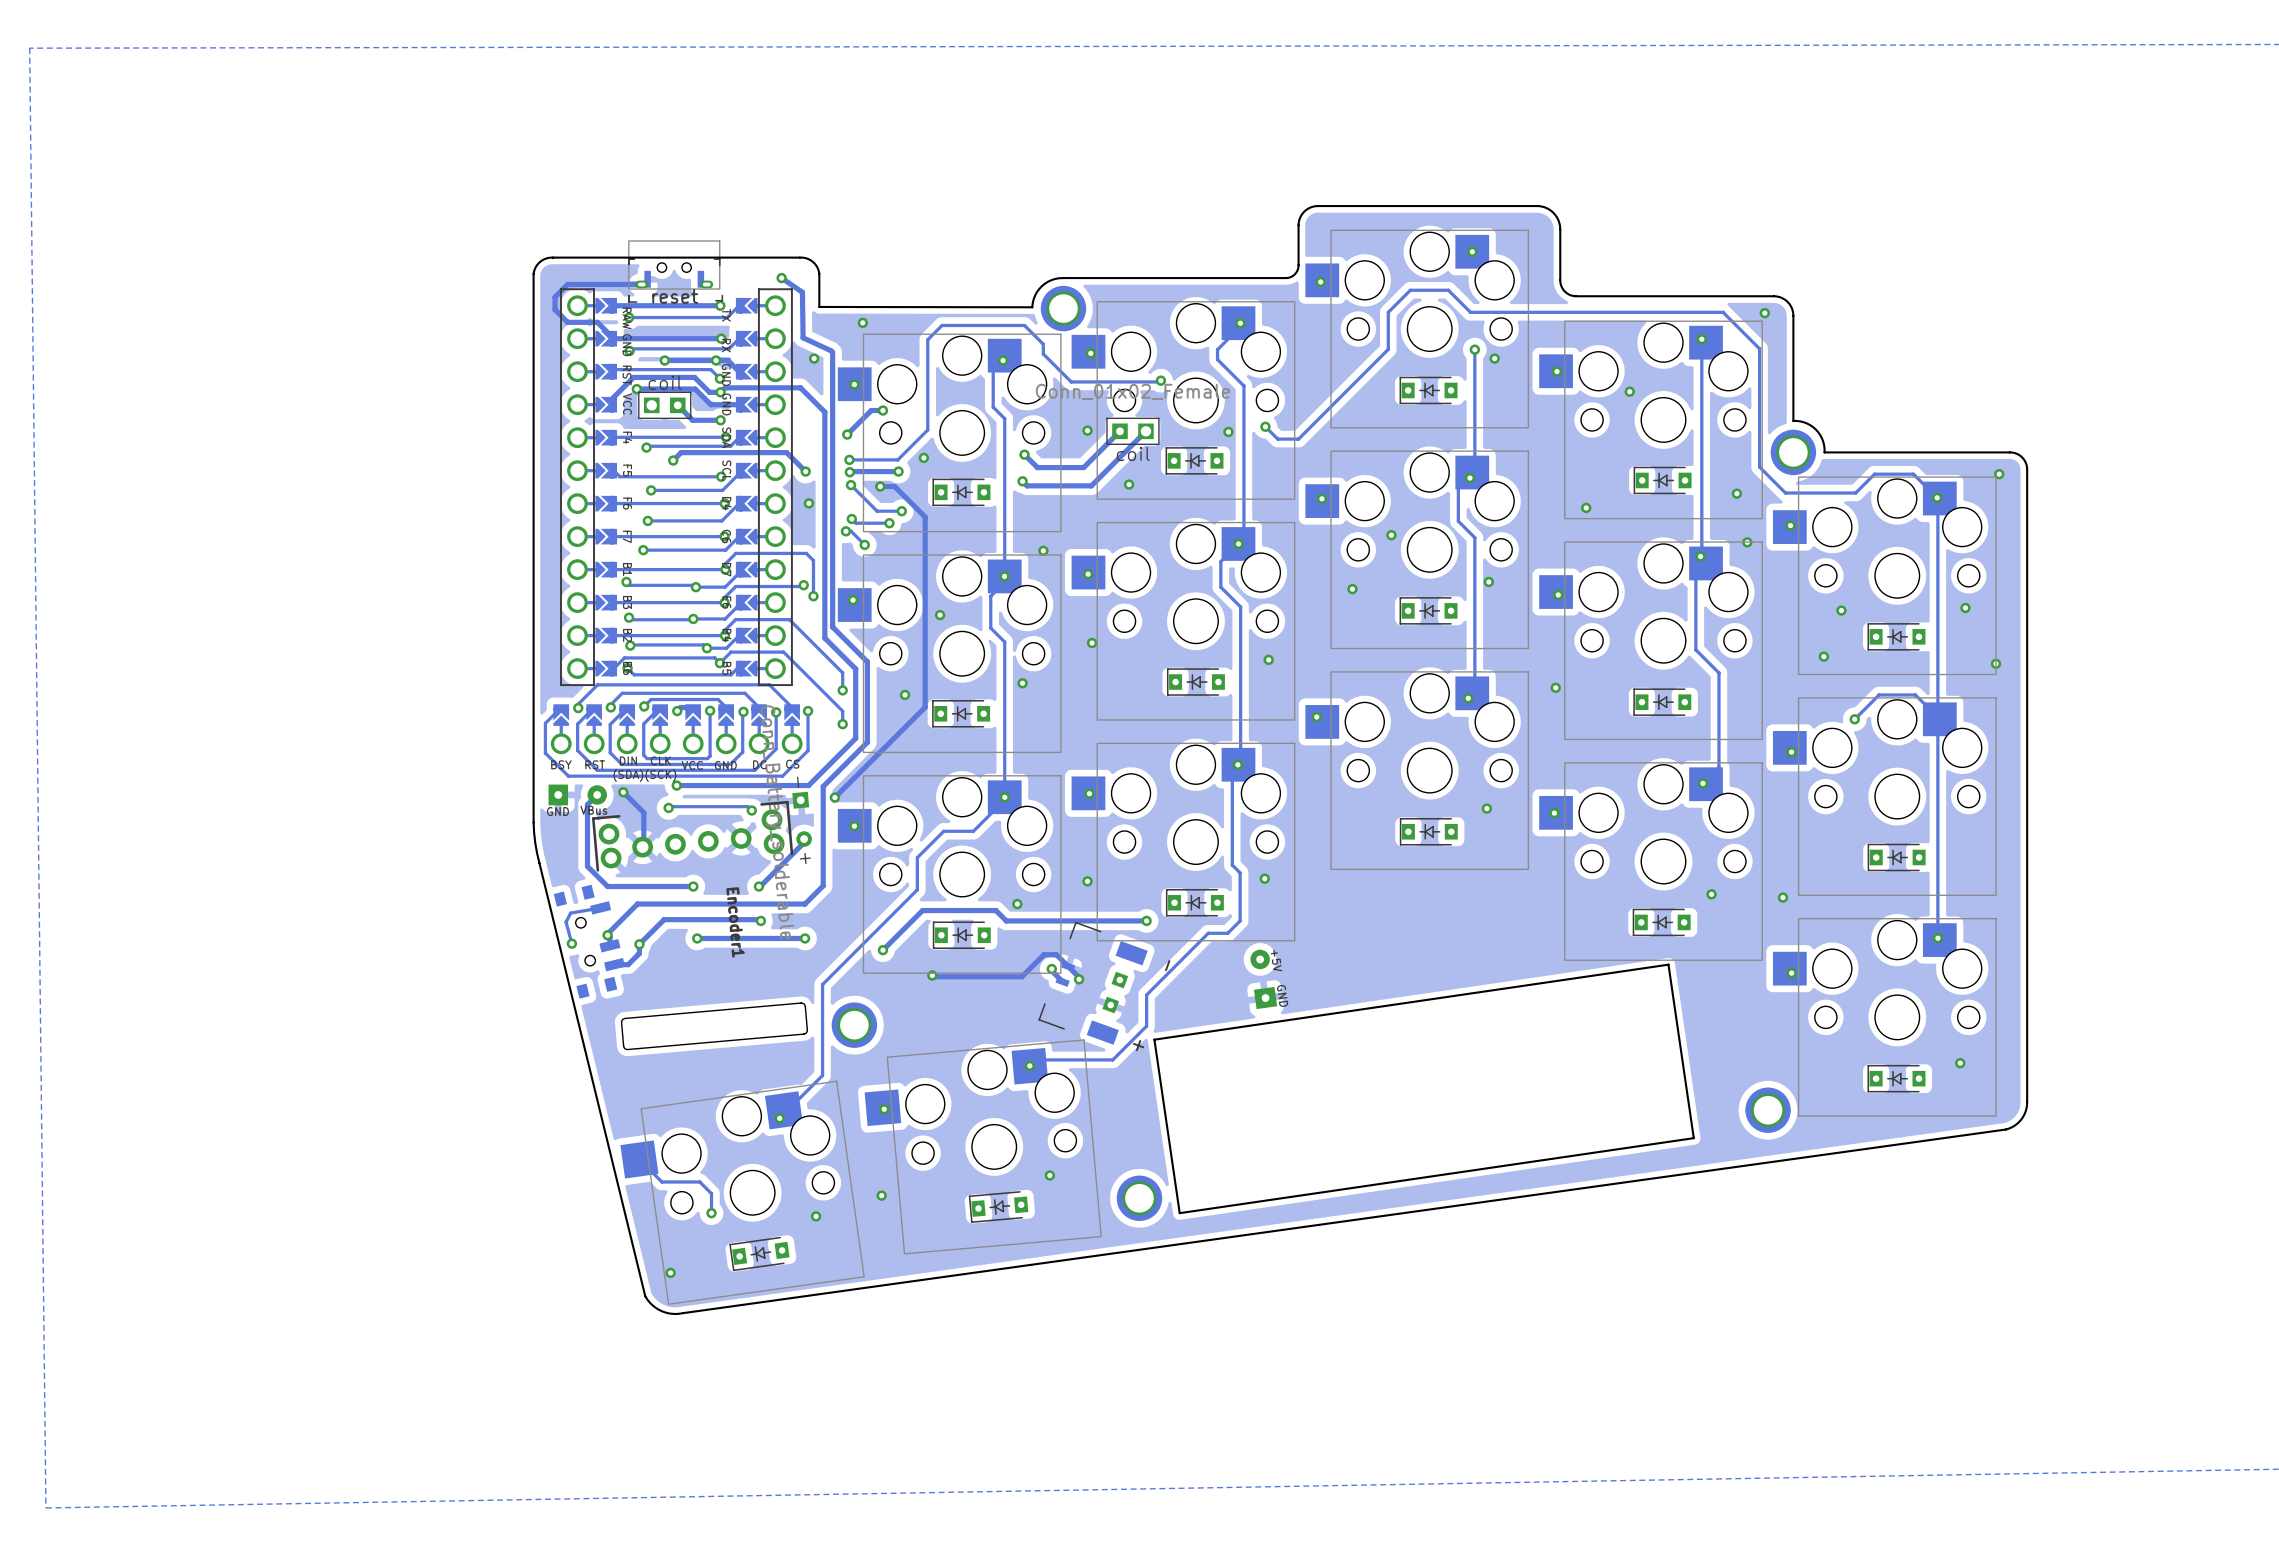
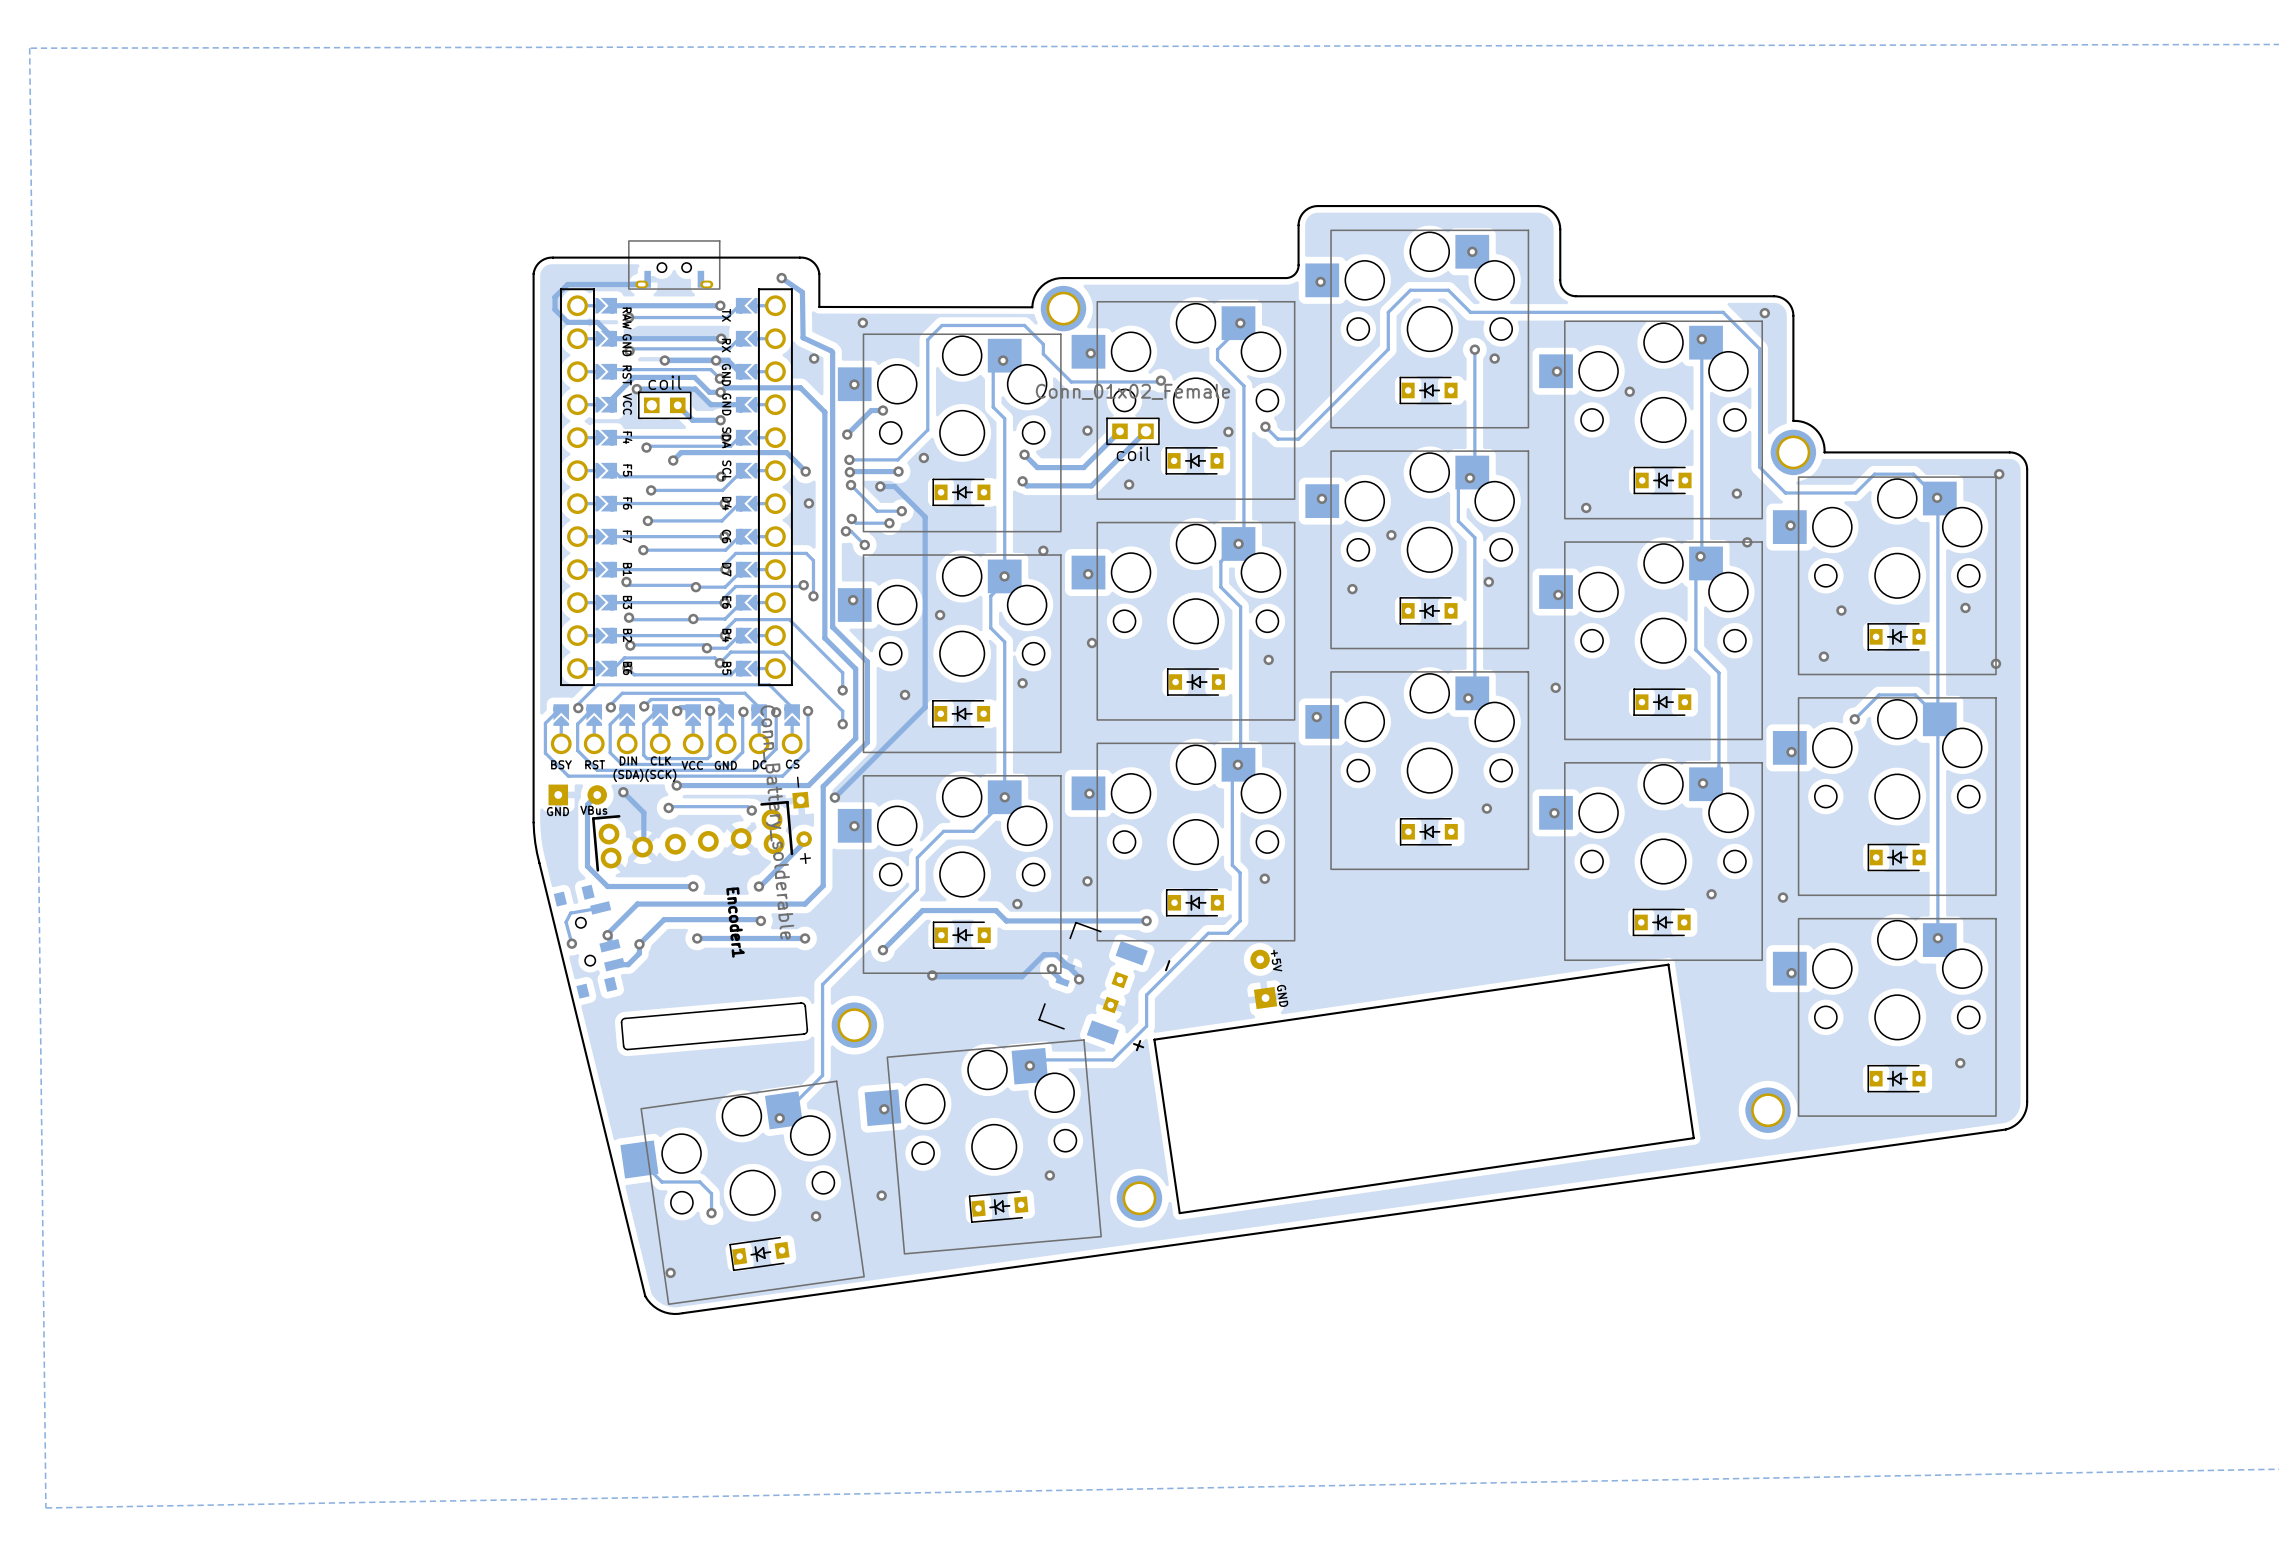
part footprint: [628, 240, 724, 303] -> [628, 240, 721, 290]

